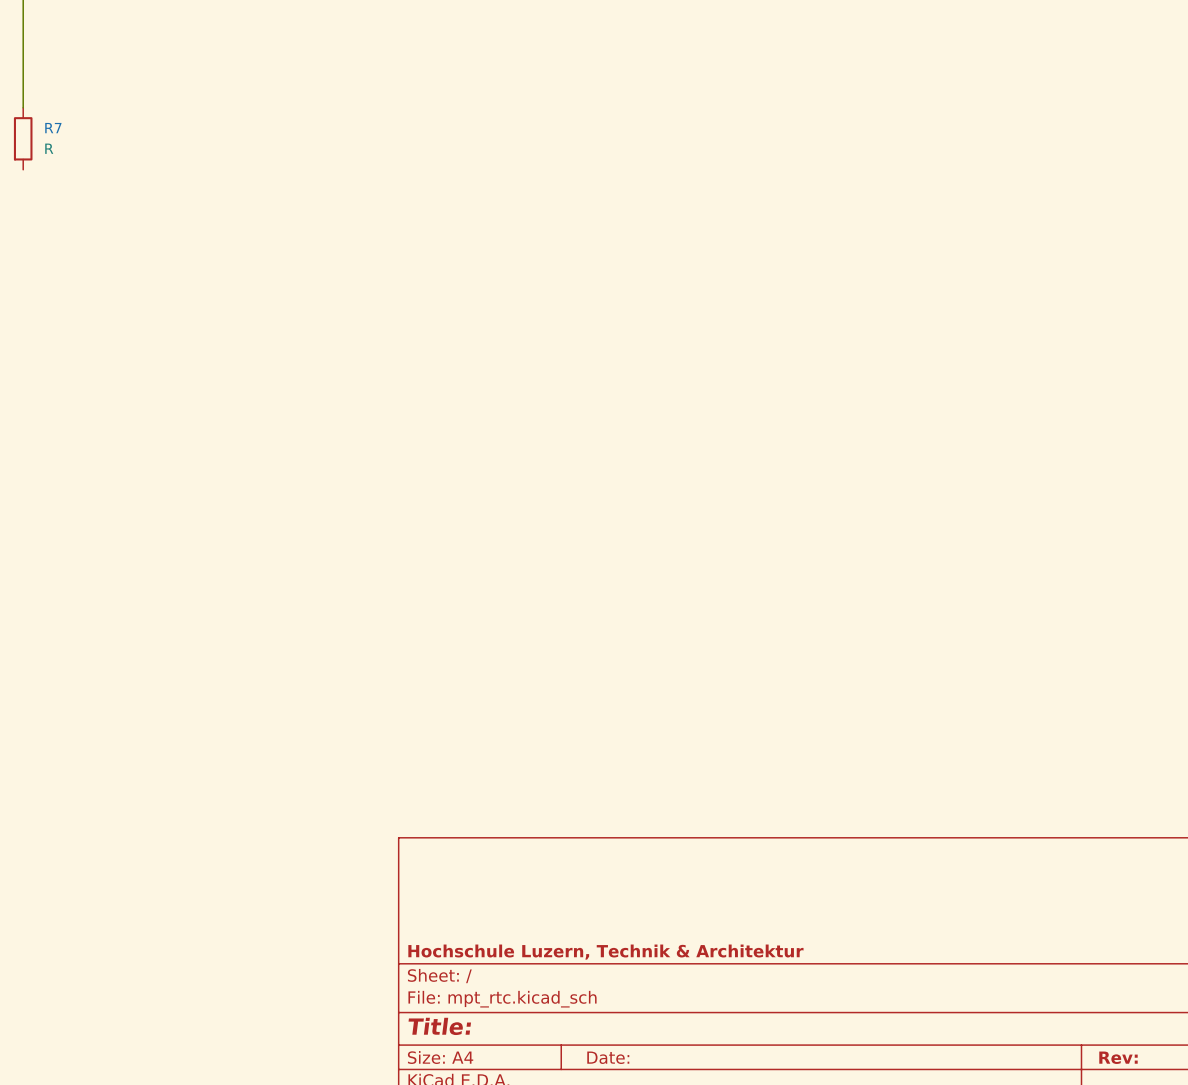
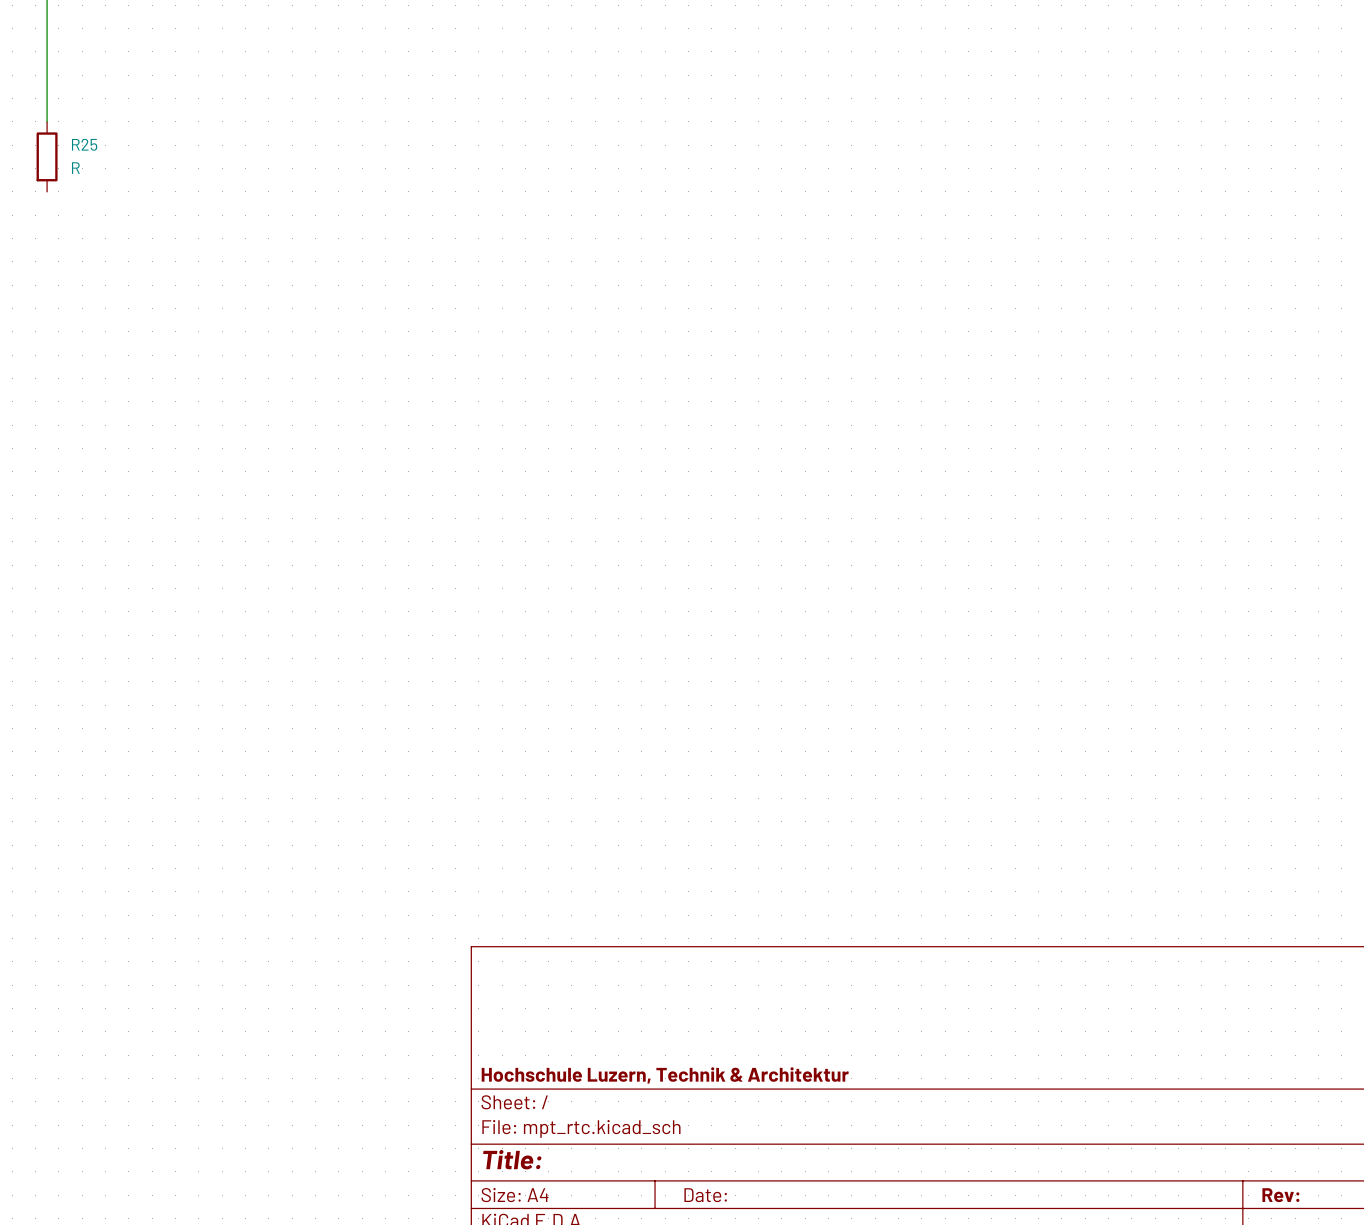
R7 name: R7 (53, 128) -> R25 (84, 144)

